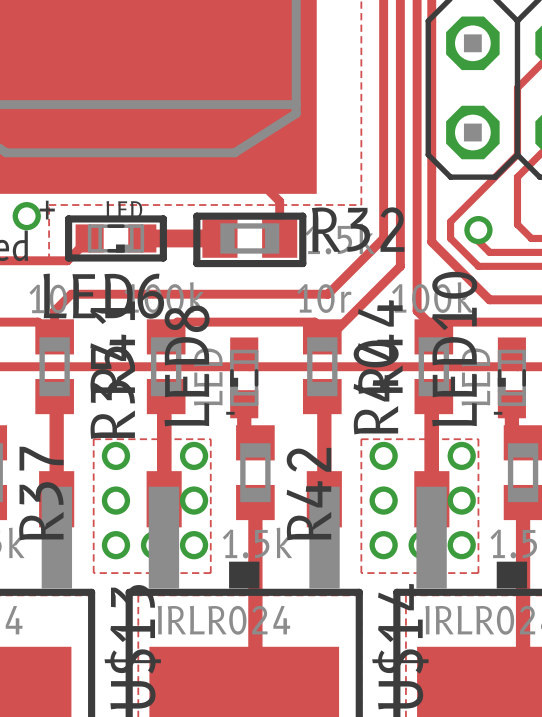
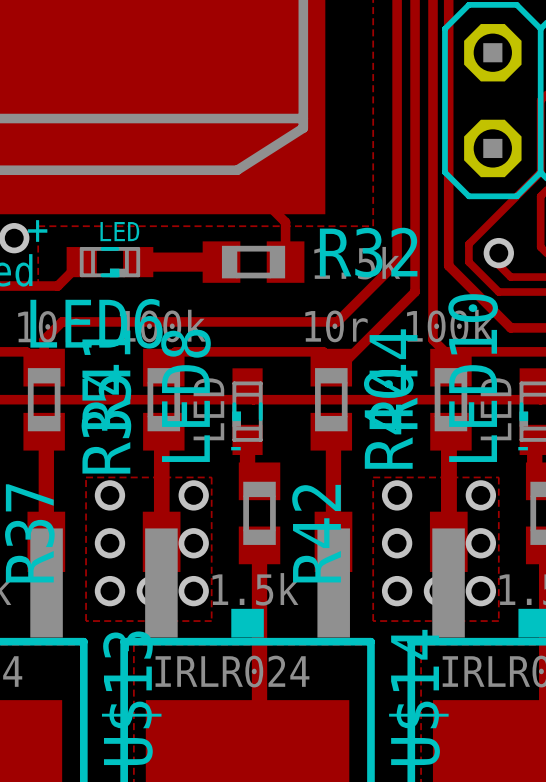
line: (196, 216) (196, 263) (302, 263) (302, 216) (196, 216) -> none
line: (68, 218) (68, 257) (163, 257) (163, 218) (68, 218) -> none

